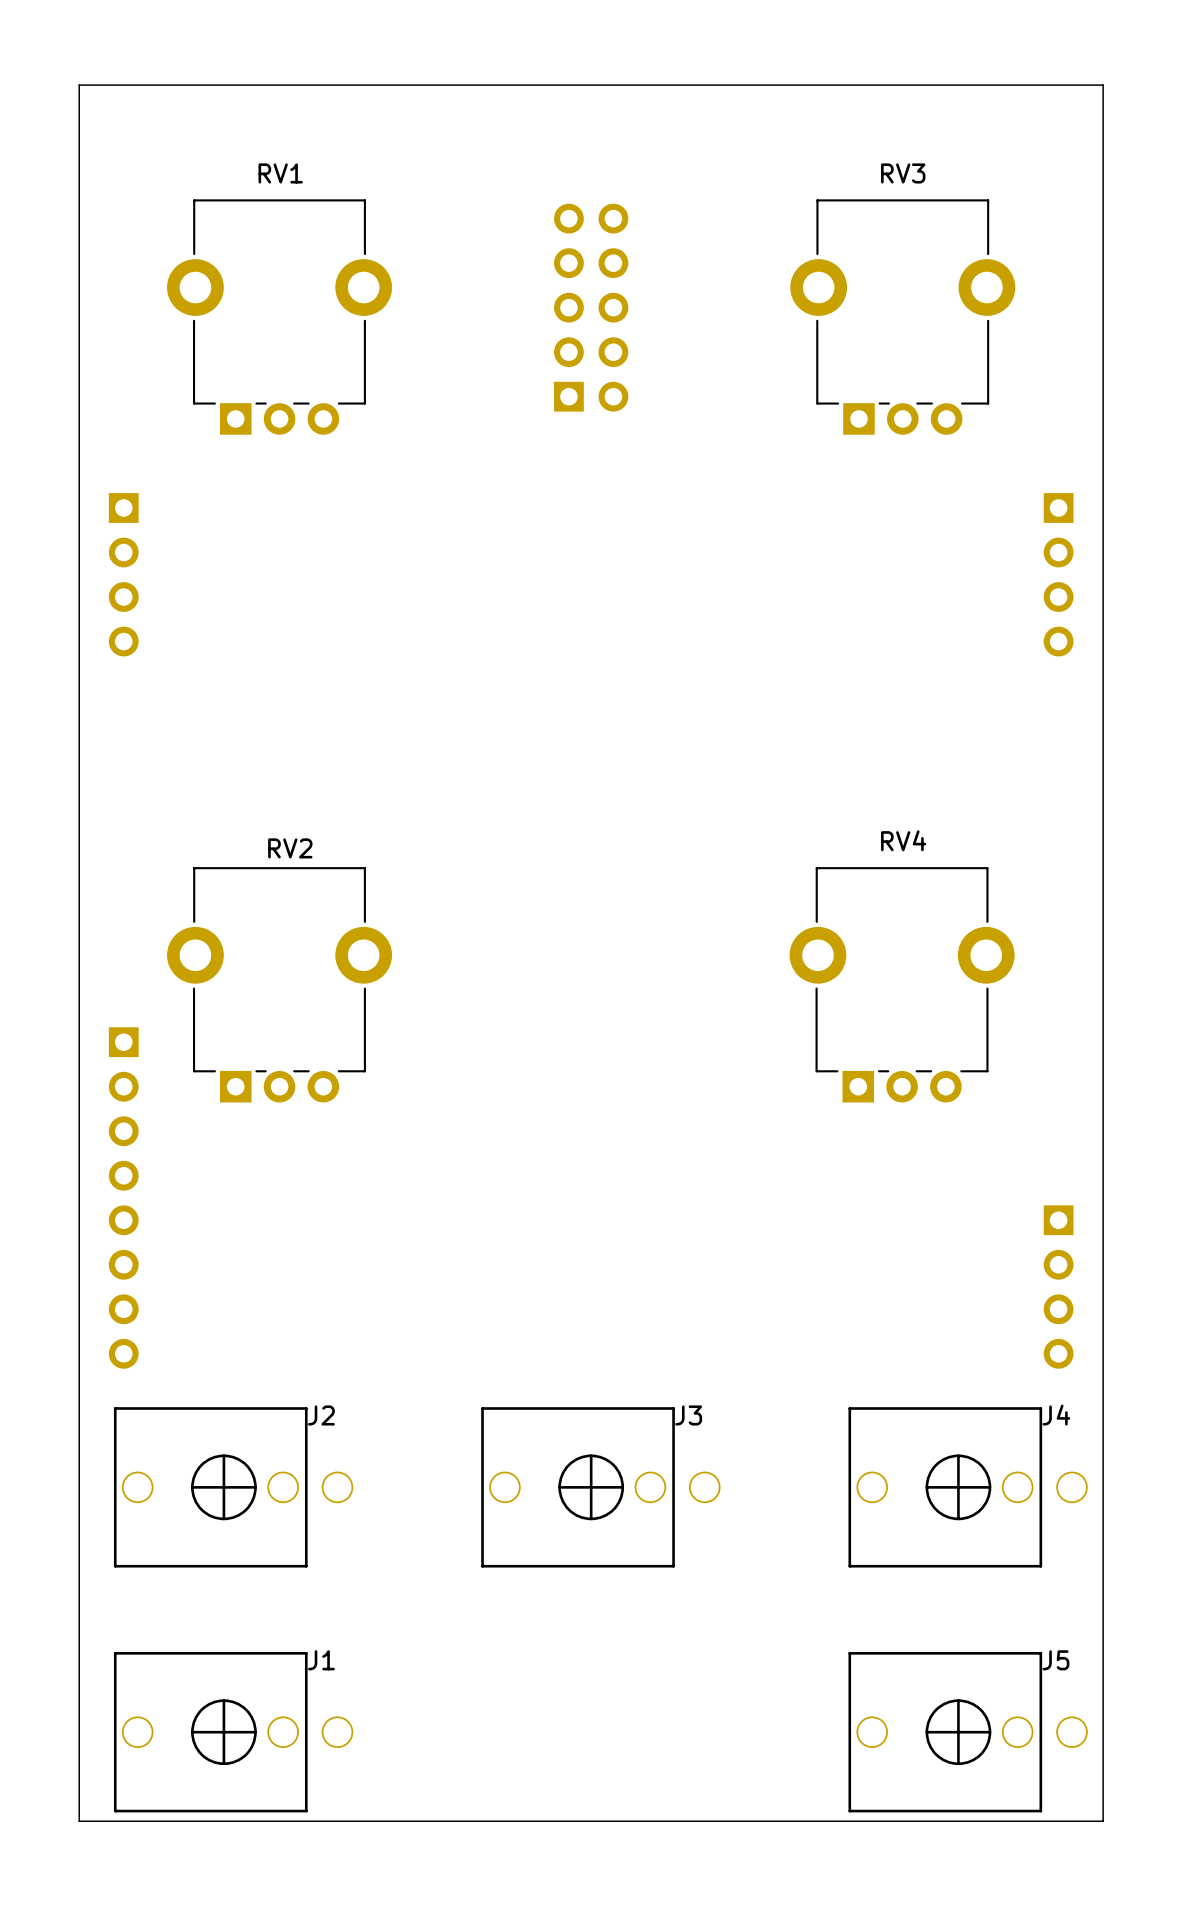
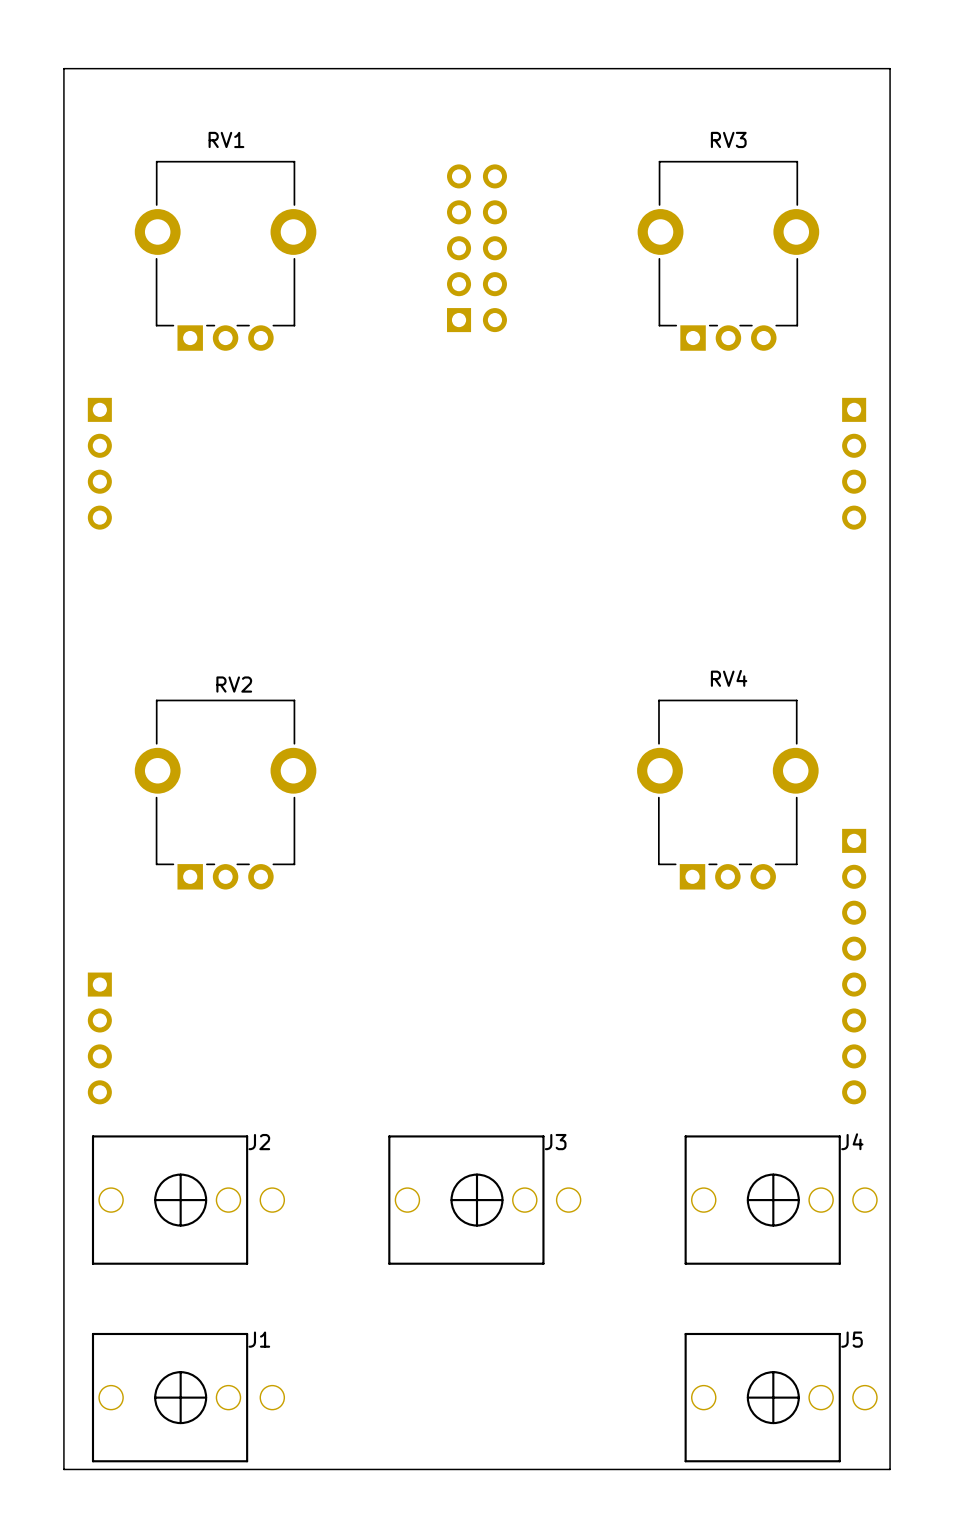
part: (123, 1198) -> none
part: none -> (854, 966)
part: none -> (99, 1038)
part: (1058, 1287) -> none

